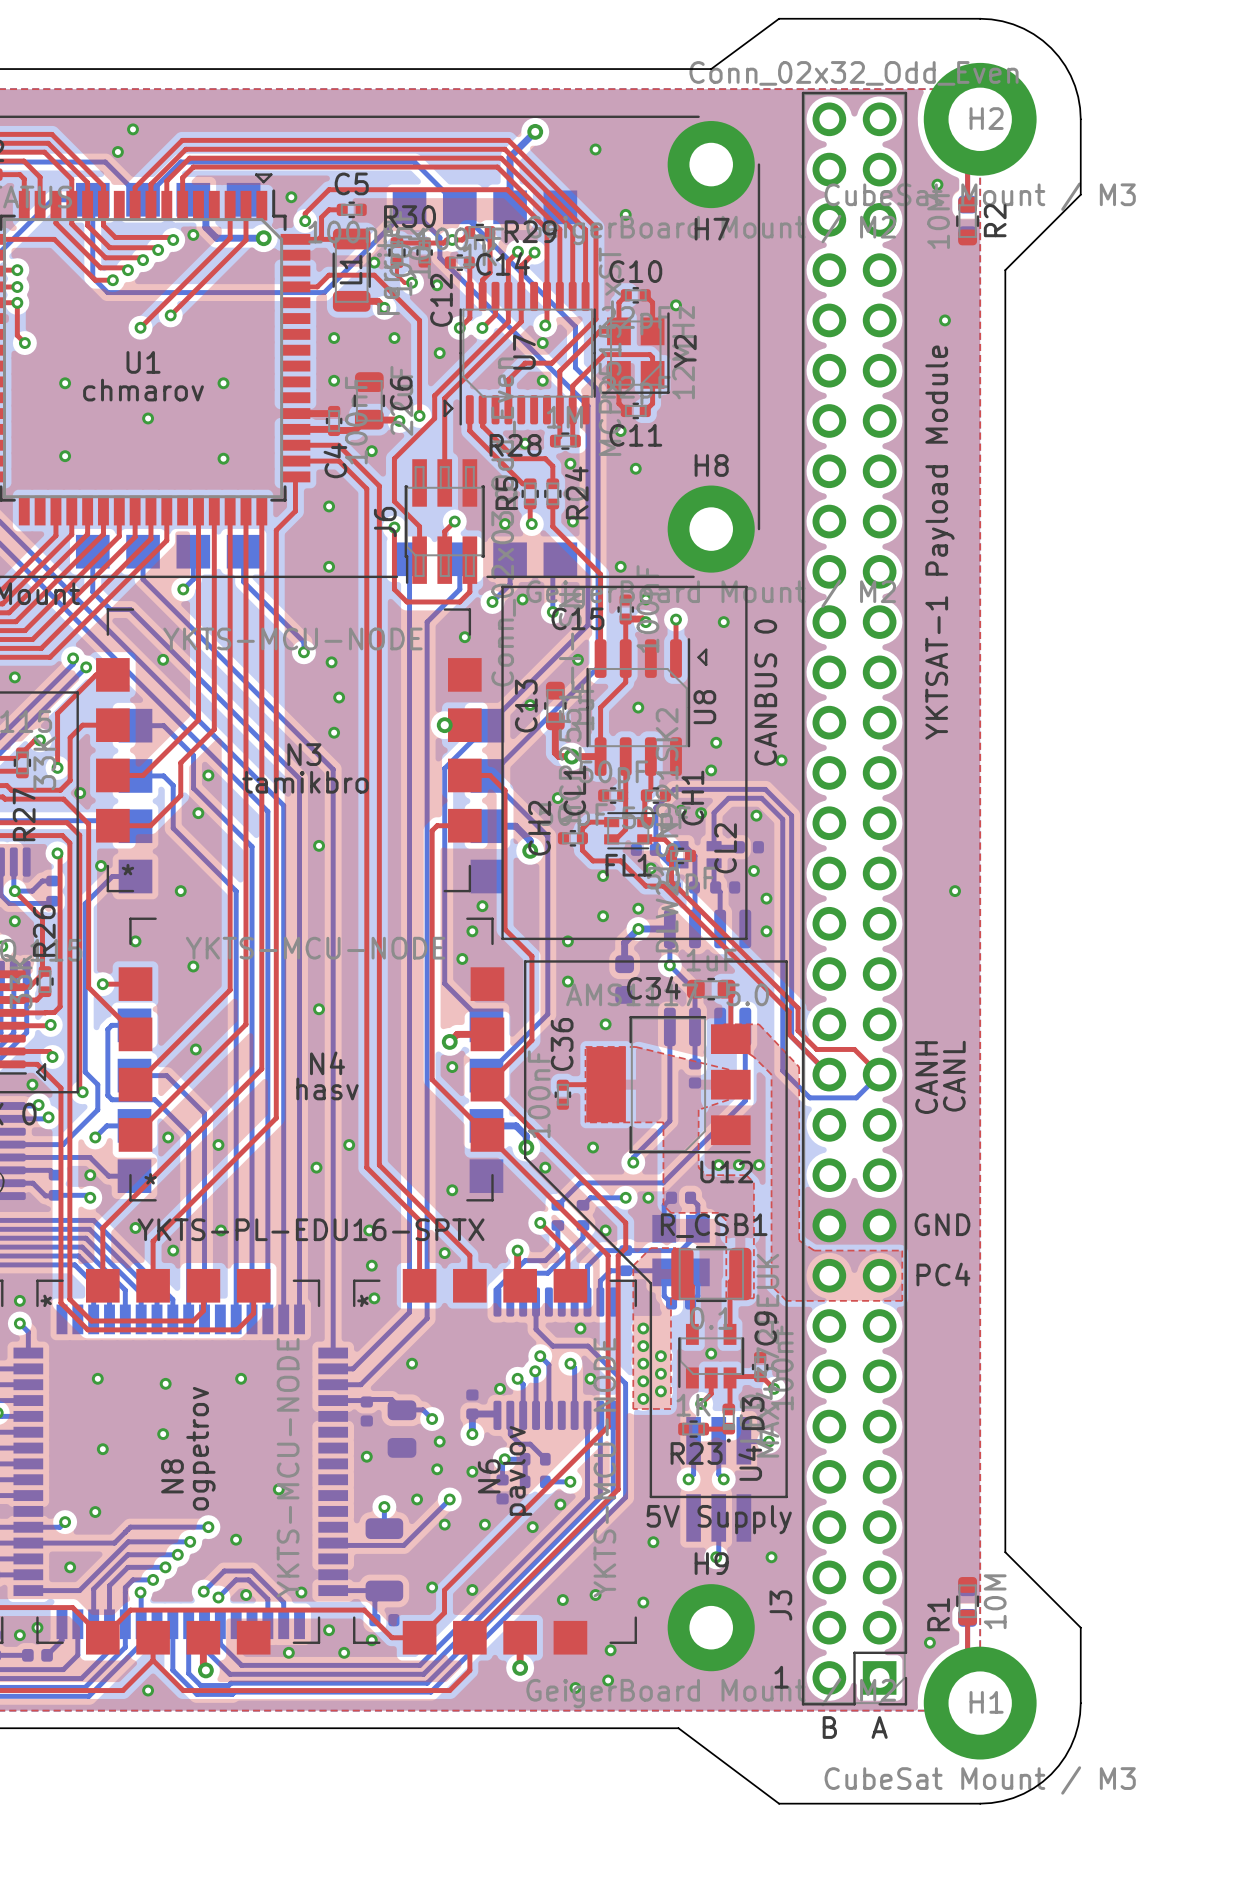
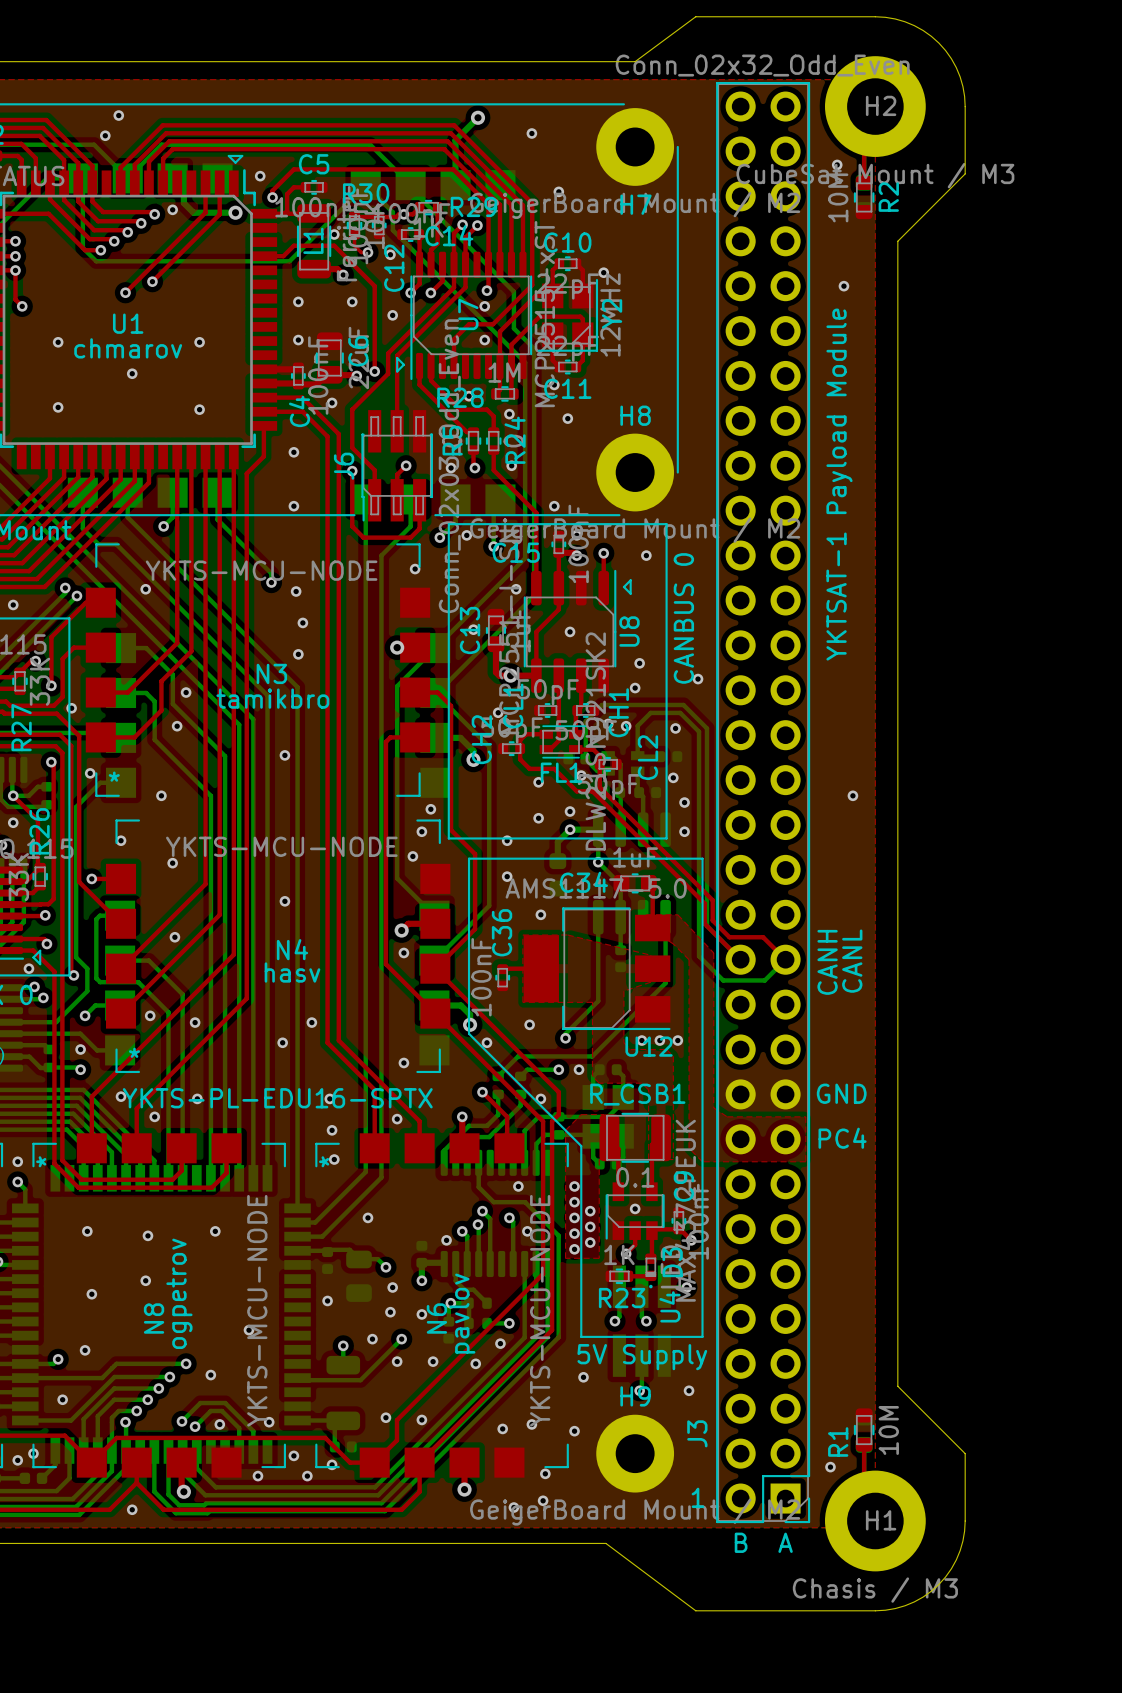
H1 value: CubeSat Mount / M3 (980, 1780) -> Chasis / M3 (875, 1590)

